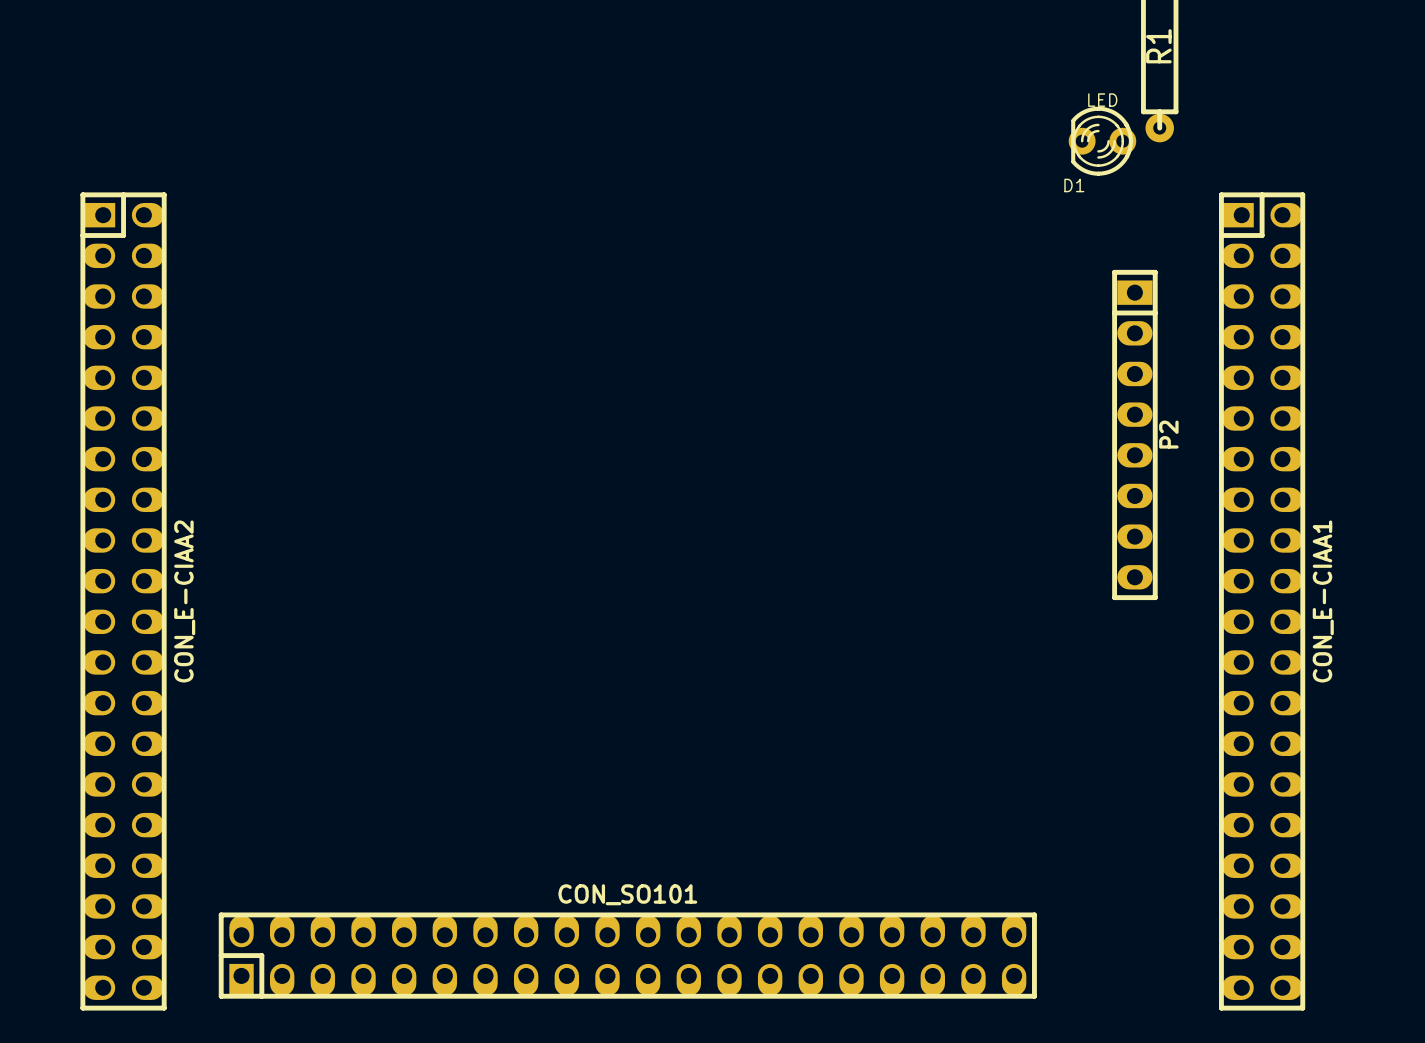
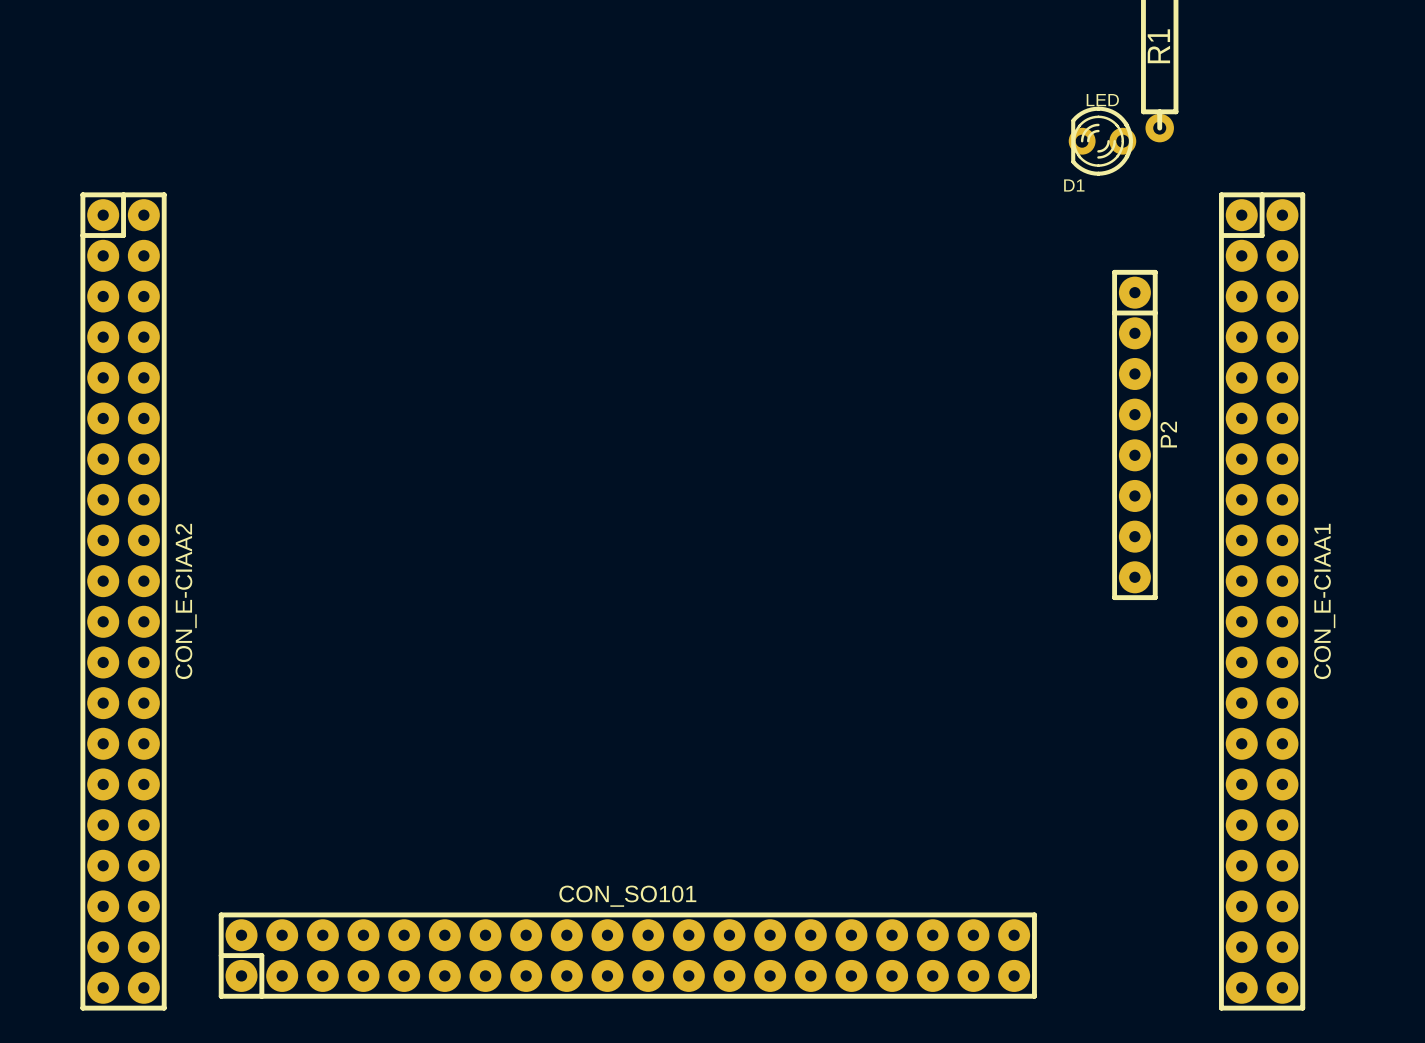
CON_E-CIAA2 footprint: [80, 192, 167, 1011] -> [80, 192, 167, 1011]
CON_E-CIAA1 footprint: [1219, 192, 1306, 1011] -> [1219, 192, 1306, 1011]
P2 footprint: [1112, 269, 1158, 601] -> [1112, 269, 1158, 601]
CON_SO101 footprint: [218, 912, 1037, 999] -> [218, 912, 1037, 999]

